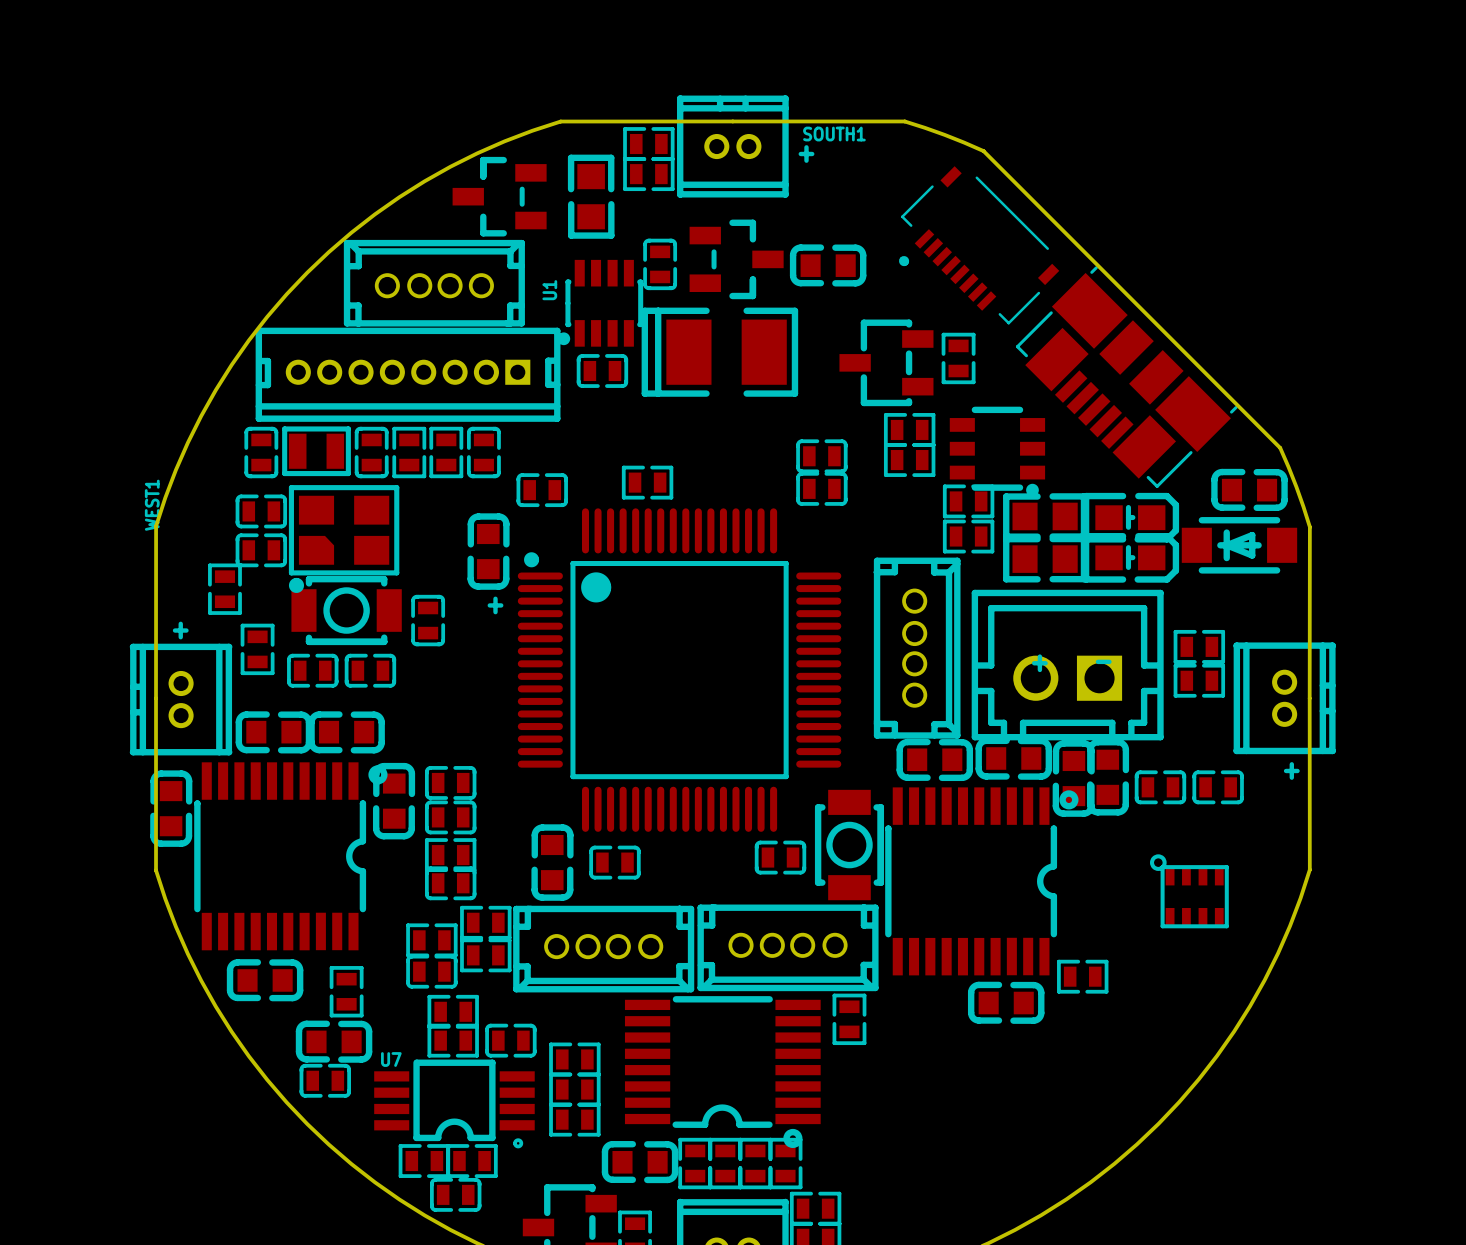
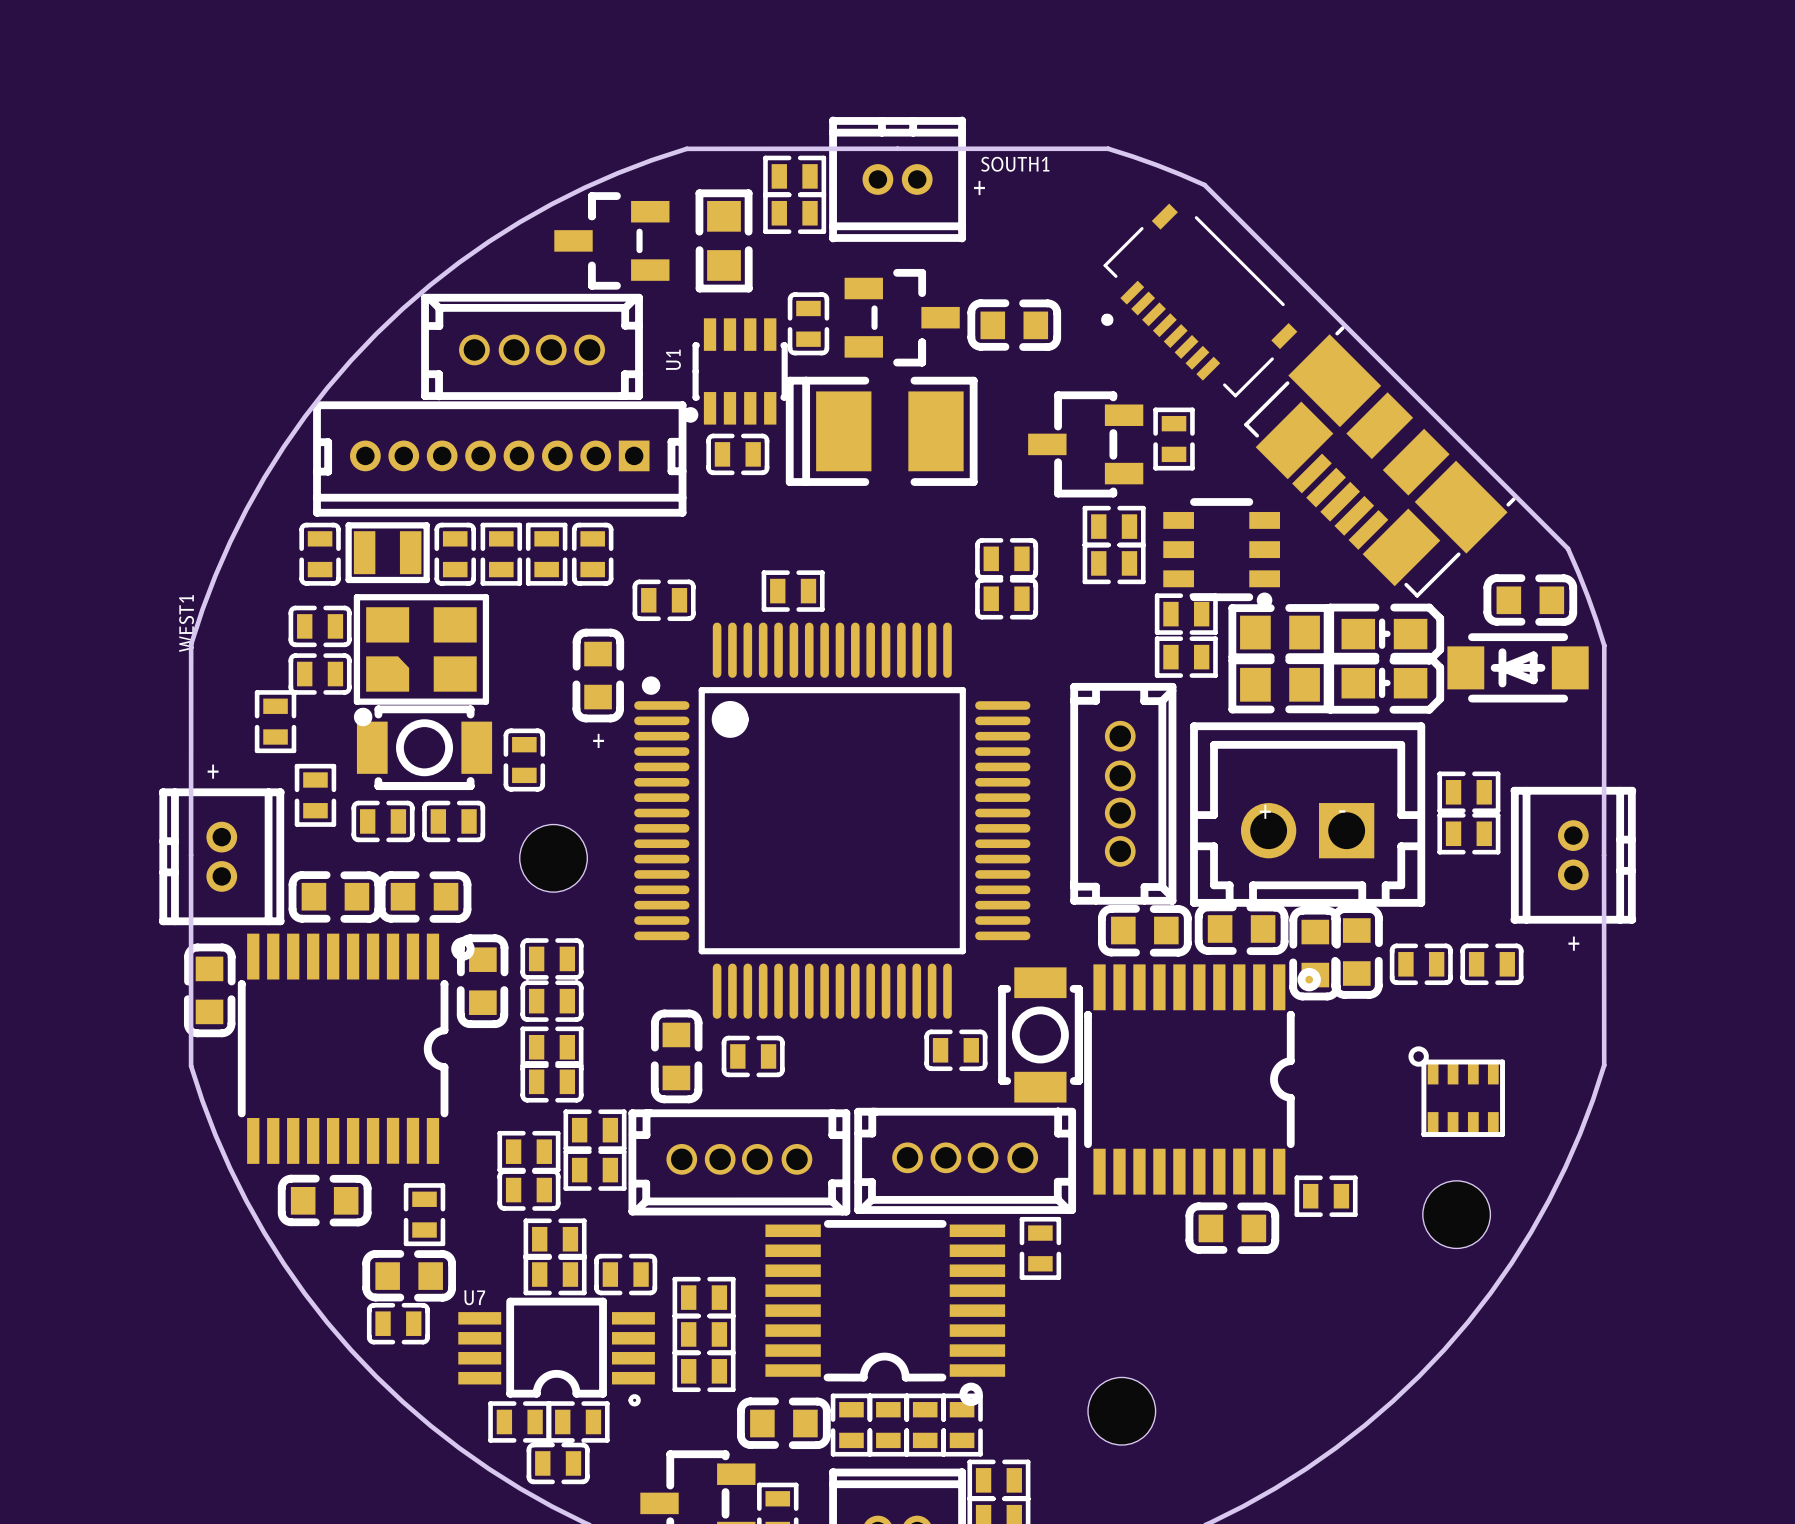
part: none -> (553, 858)
part: none -> (1456, 1214)
part: none -> (1121, 1411)

